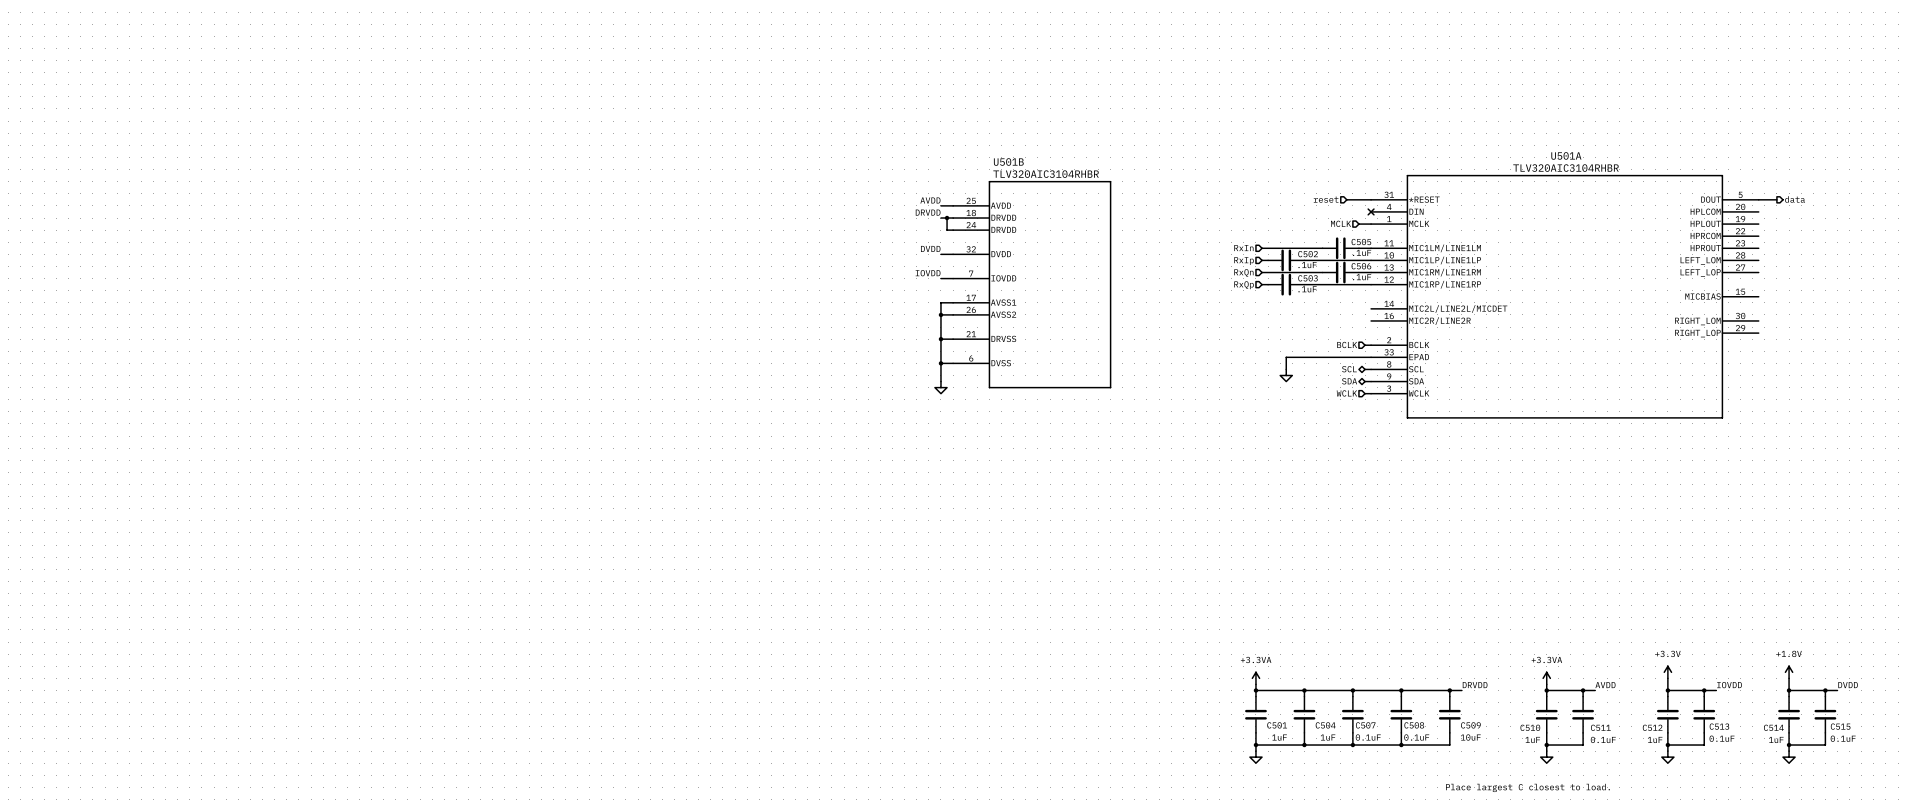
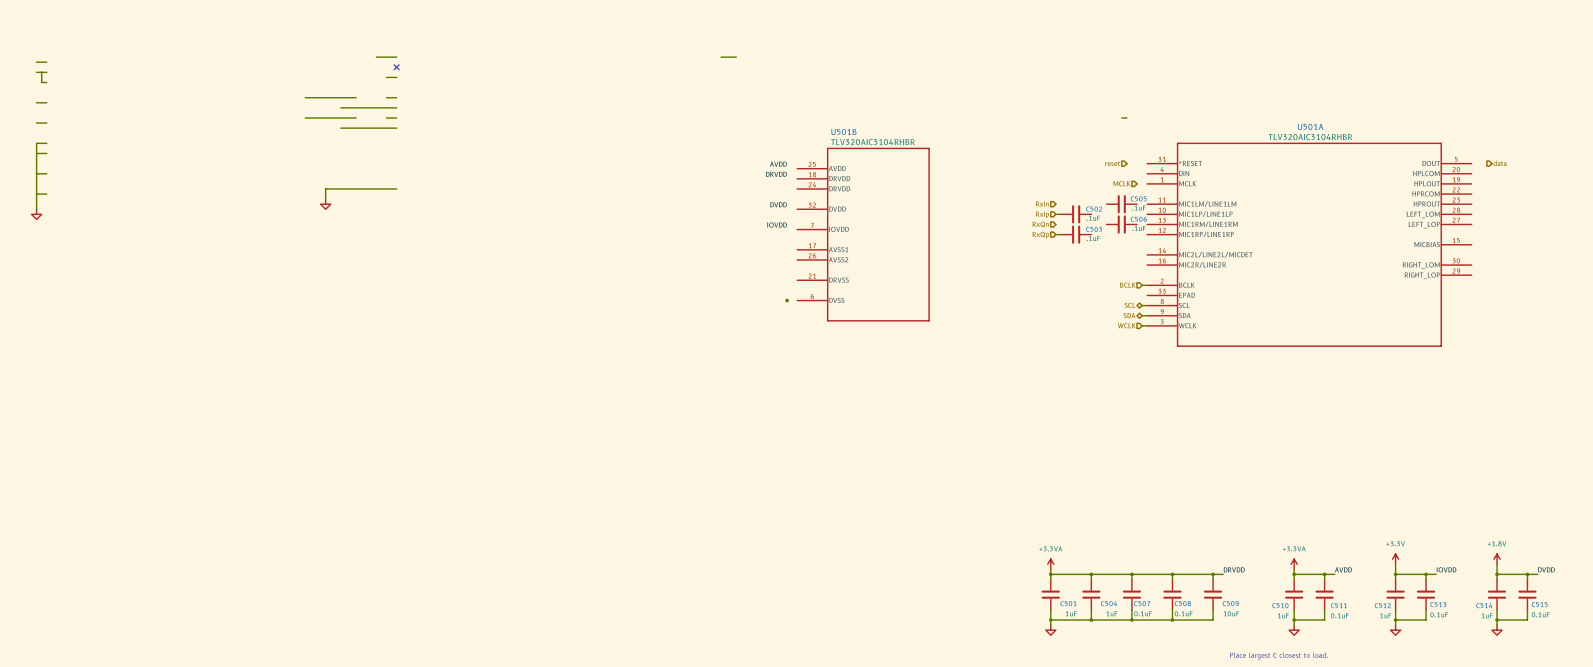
wire: none -> (376, 57) (396, 57)
wire: none -> (721, 57) (736, 57)
wire: none -> (36, 62) (46, 62)
no-connect mark: none -> (396, 67)
wire: none -> (36, 72) (46, 72)
wire: none -> (41, 72) (41, 82) (46, 82)
wire: none -> (386, 77) (396, 77)
wire: none -> (305, 97) (356, 97)
wire: none -> (386, 97) (396, 97)
wire: none -> (36, 102) (46, 102)
wire: none -> (340, 107) (396, 107)
wire: none -> (305, 117) (356, 117)
wire: none -> (386, 117) (396, 117)
wire: none -> (1121, 117) (1126, 117)
wire: none -> (36, 123) (46, 123)
wire: none -> (340, 128) (396, 128)
wire: none -> (46, 143) (36, 143) (36, 209)
wire: none -> (36, 153) (46, 153)
wire: (1346, 199) (1371, 199) -> none
wire: (1758, 199) (1776, 199) -> none
wire: (940, 205) (953, 205) -> none
wire: none -> (36, 173) (46, 173)
no-connect mark: (1371, 211) -> none
wire: (940, 218) (953, 218) -> none
wire: (947, 218) (947, 230) (953, 230) -> none
junction: (947, 218) -> none
wire: (1358, 224) (1371, 224) -> none
wire: none -> (396, 188) (325, 188) (325, 199)
wire: none -> (36, 194) (46, 194)
power symbol: none -> (325, 204)
wire: (1262, 248) (1322, 248) -> none
wire: (1358, 248) (1371, 248) -> none
wire: (940, 254) (953, 254) -> none
power symbol: none -> (36, 214)
wire: (1304, 260) (1371, 260) -> none
wire: (1262, 272) (1322, 272) -> none
wire: (1358, 272) (1371, 272) -> none
wire: (940, 278) (953, 278) -> none
wire: (1304, 284) (1371, 284) -> none
wire: (953, 302) (940, 302) (940, 381) -> none
wire: (940, 314) (953, 314) -> none
junction: (940, 314) -> none
wire: (940, 339) (953, 339) -> none
junction: (940, 339) -> none
wire: (1371, 357) (1286, 357) (1286, 369) -> none
wire: (940, 363) (953, 363) -> none
power symbol: (1286, 375) -> none
power symbol: (940, 387) -> none

